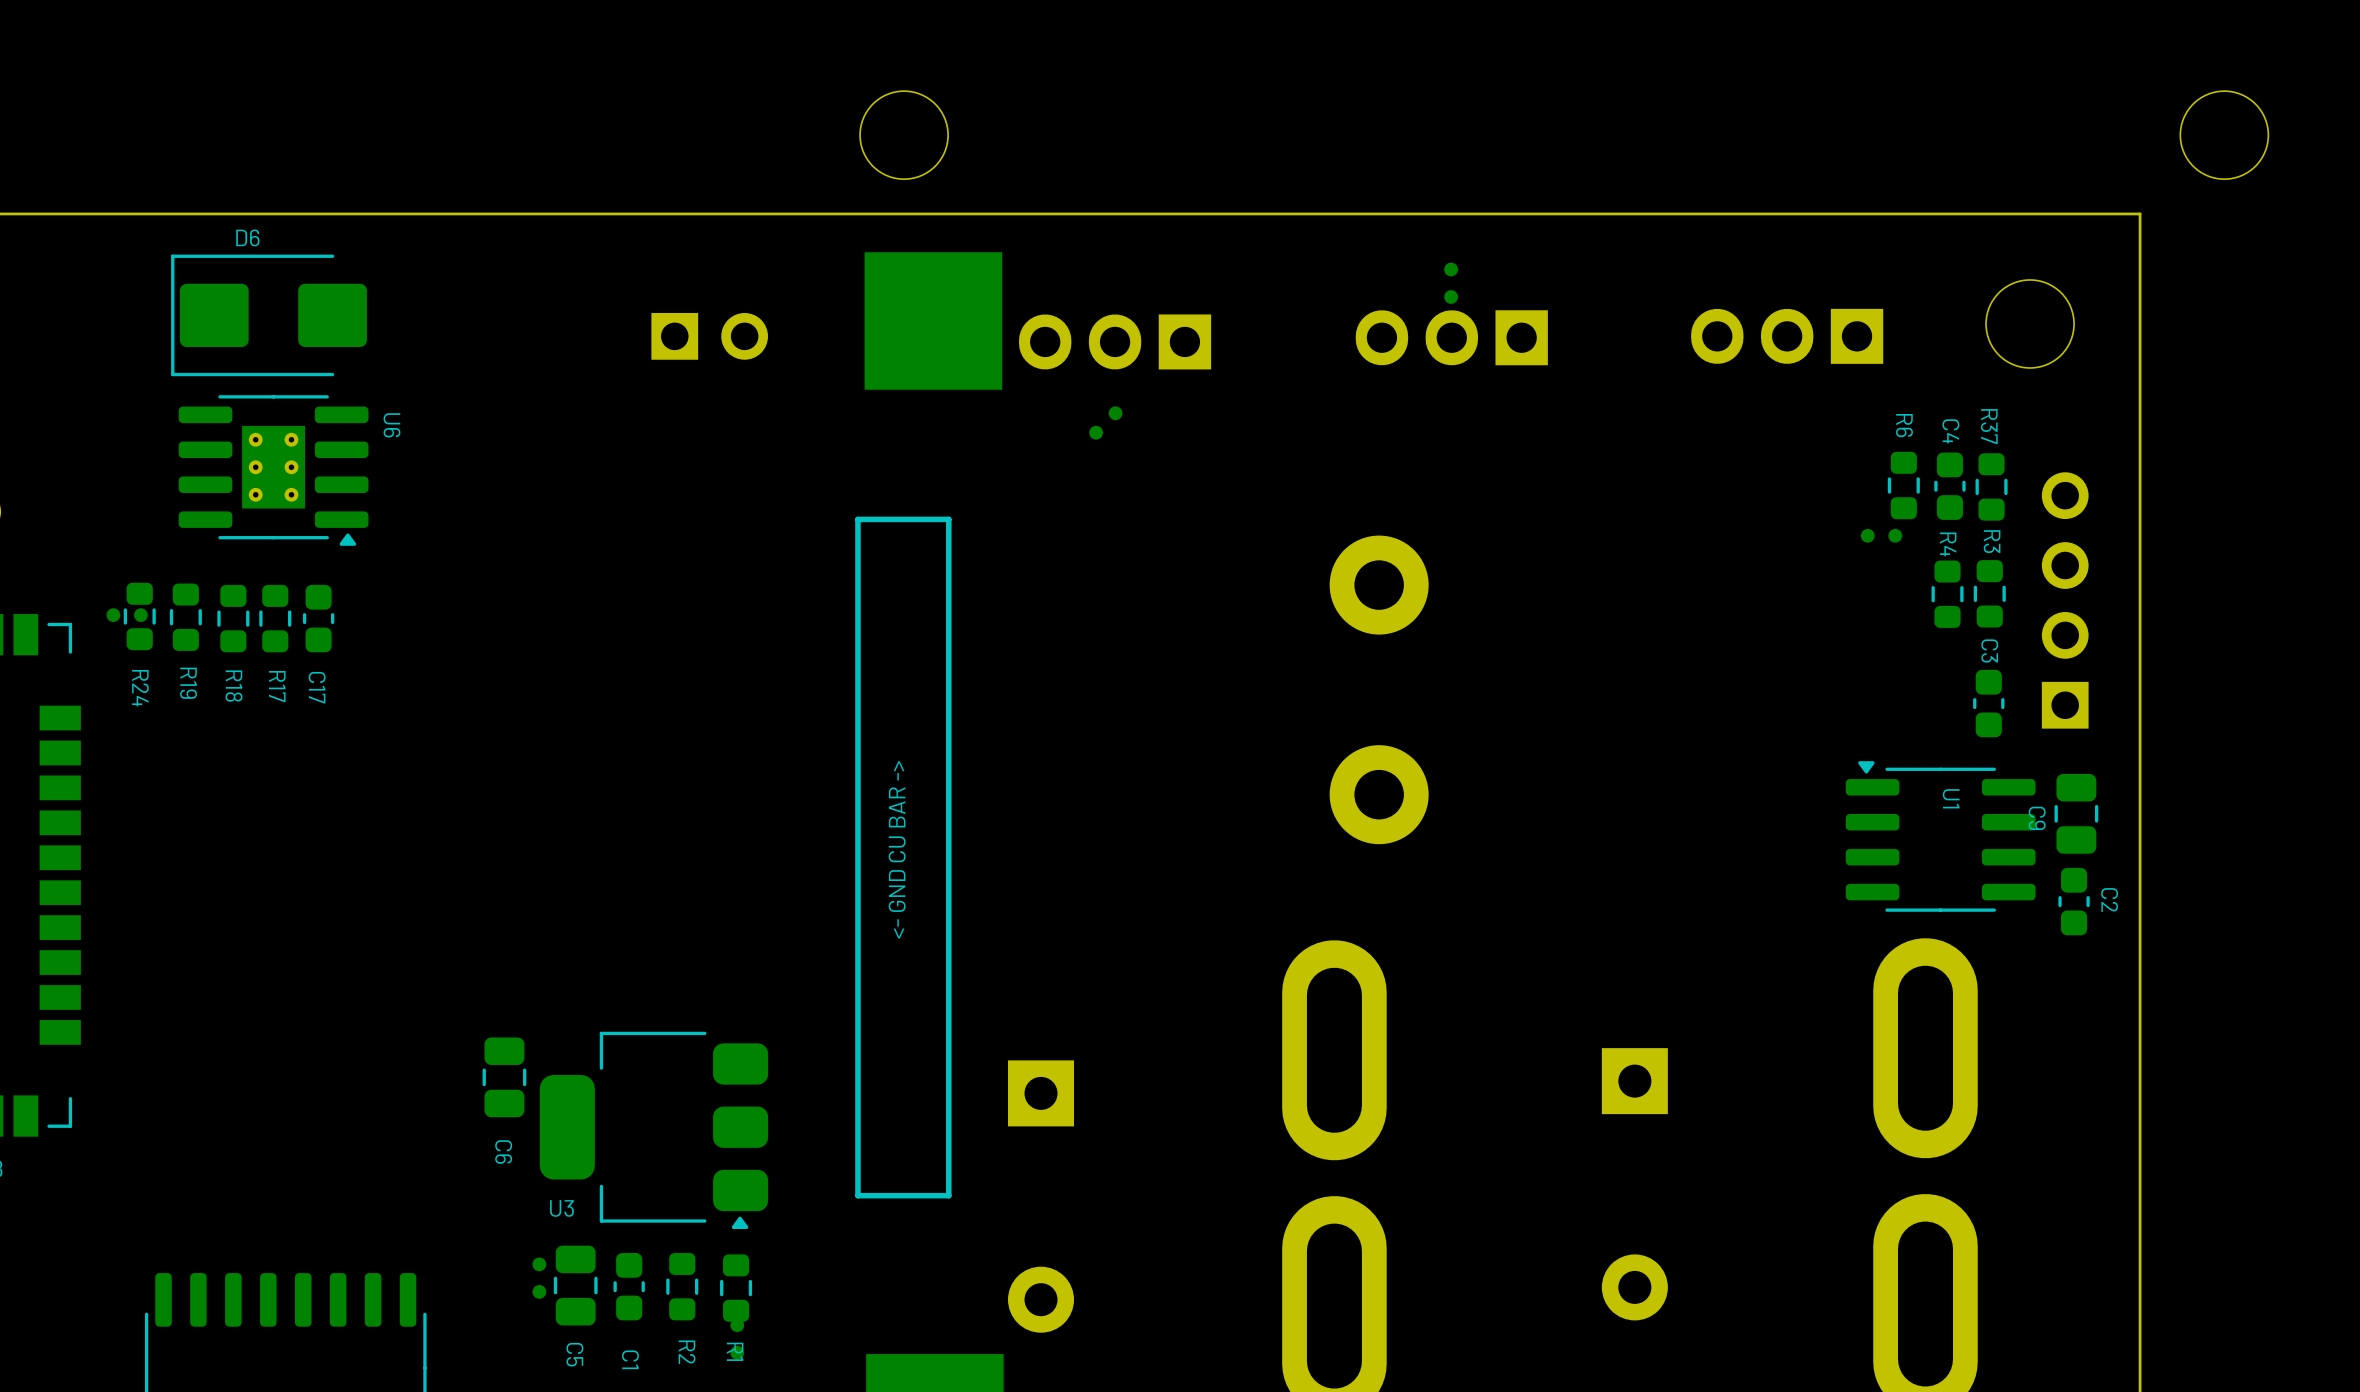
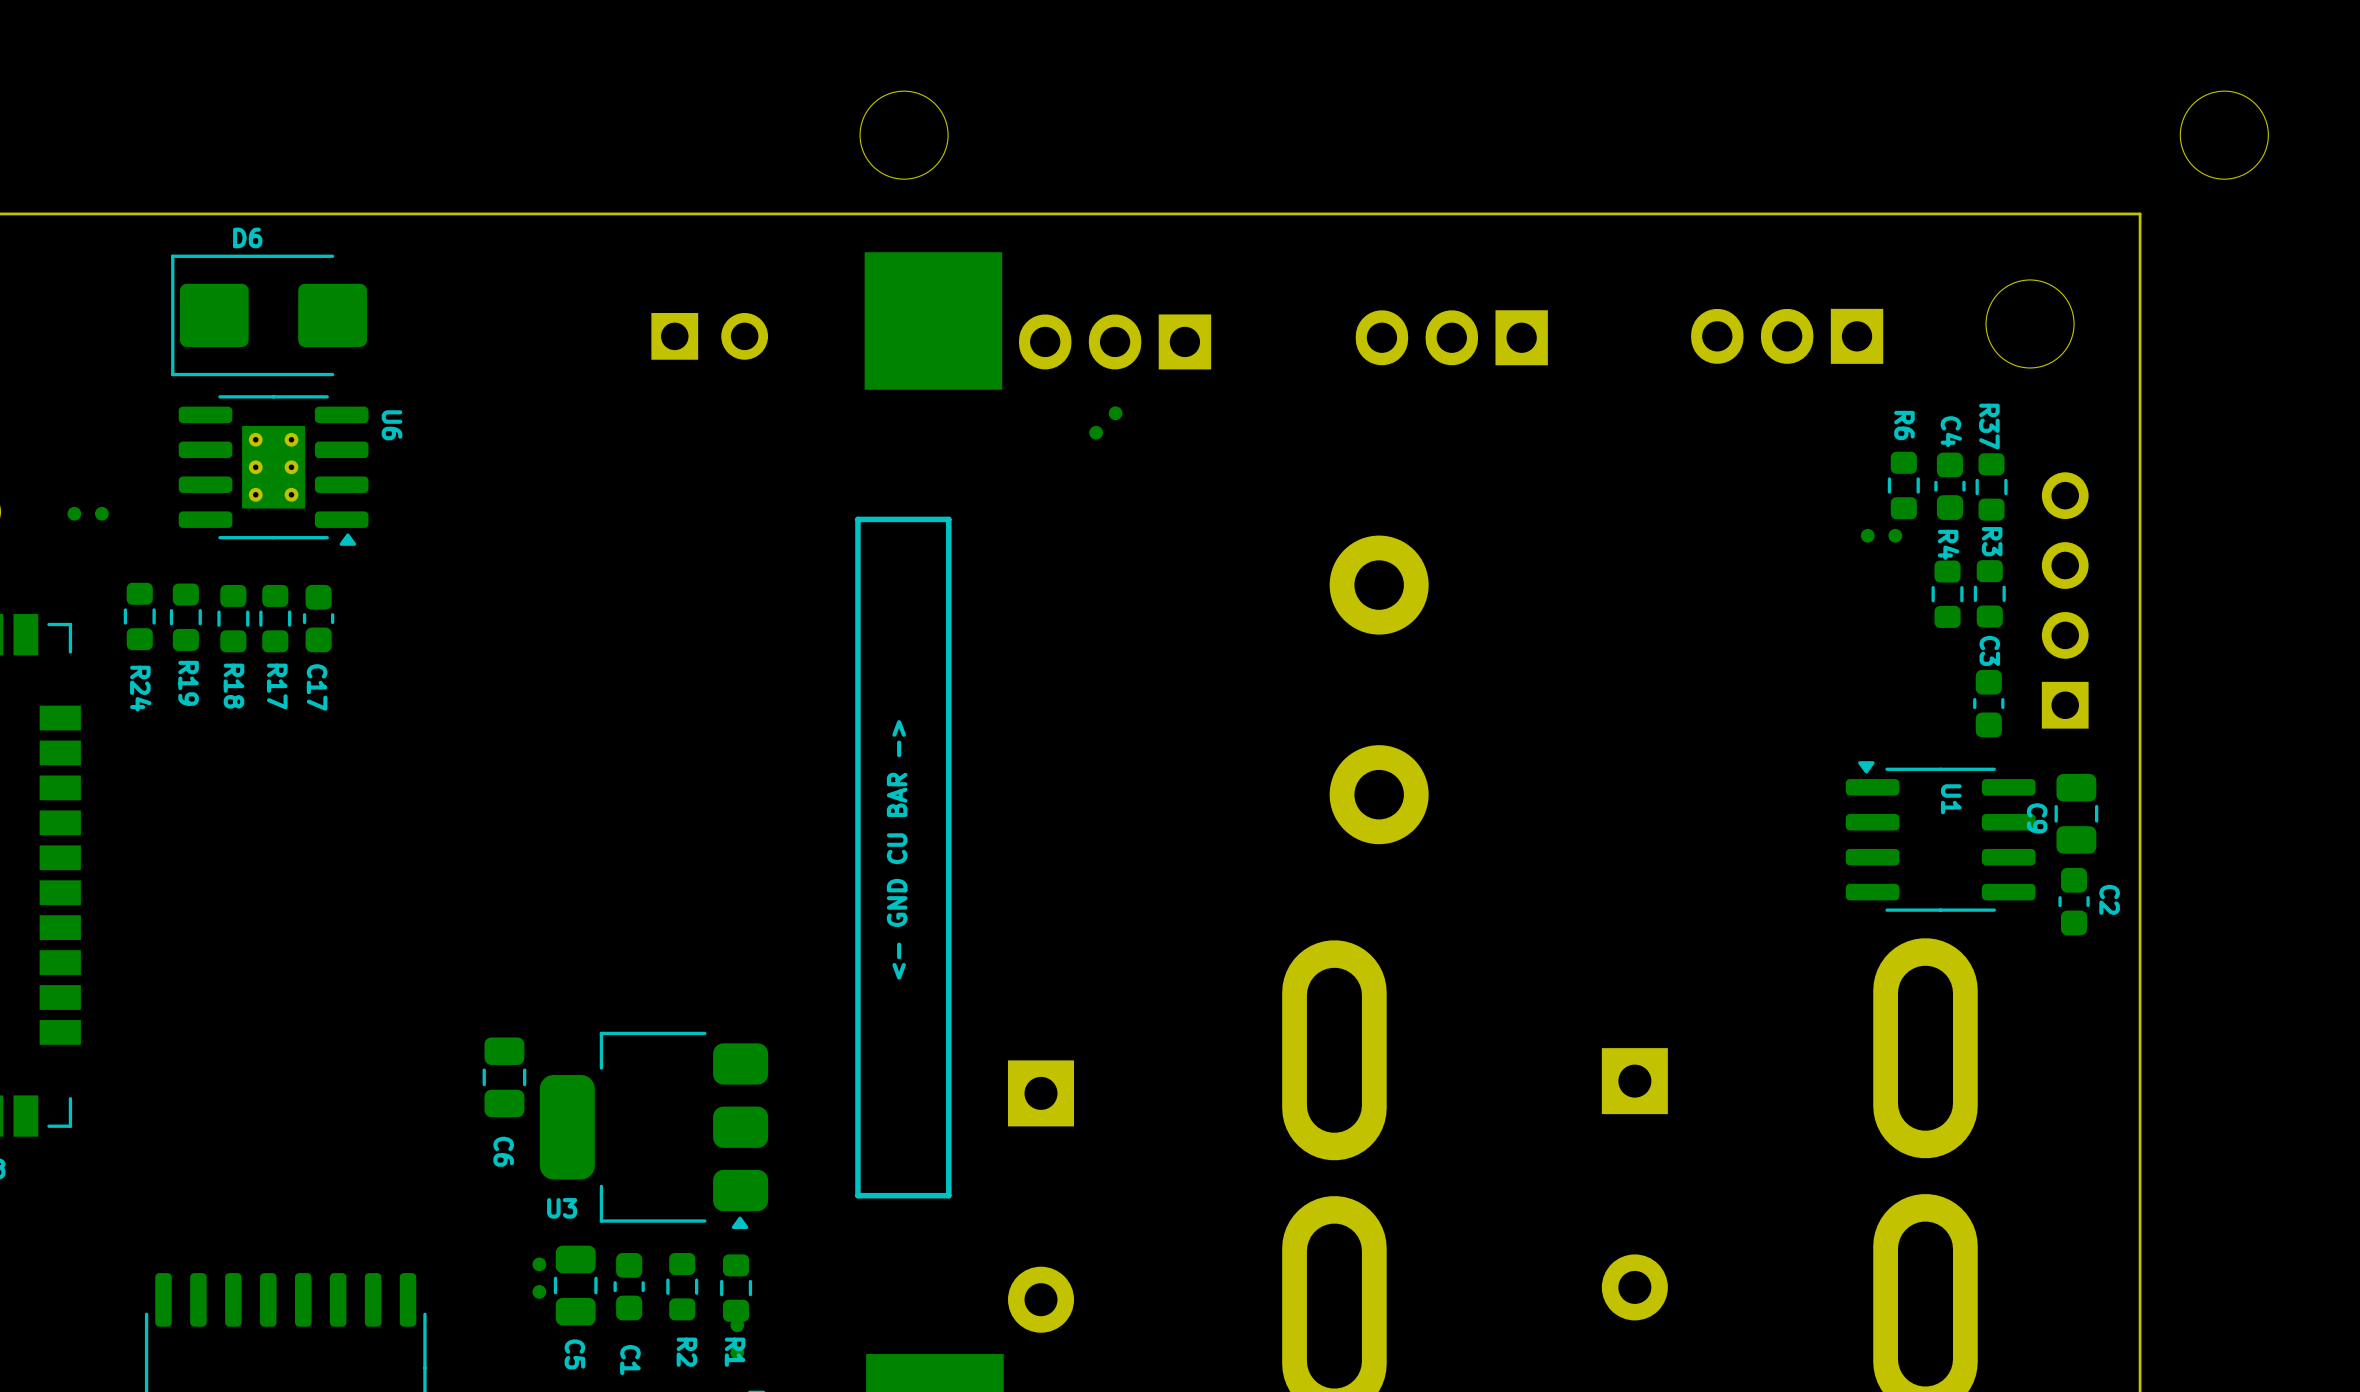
part: (1451, 283) -> none
part position: (127, 615) -> (88, 513)

